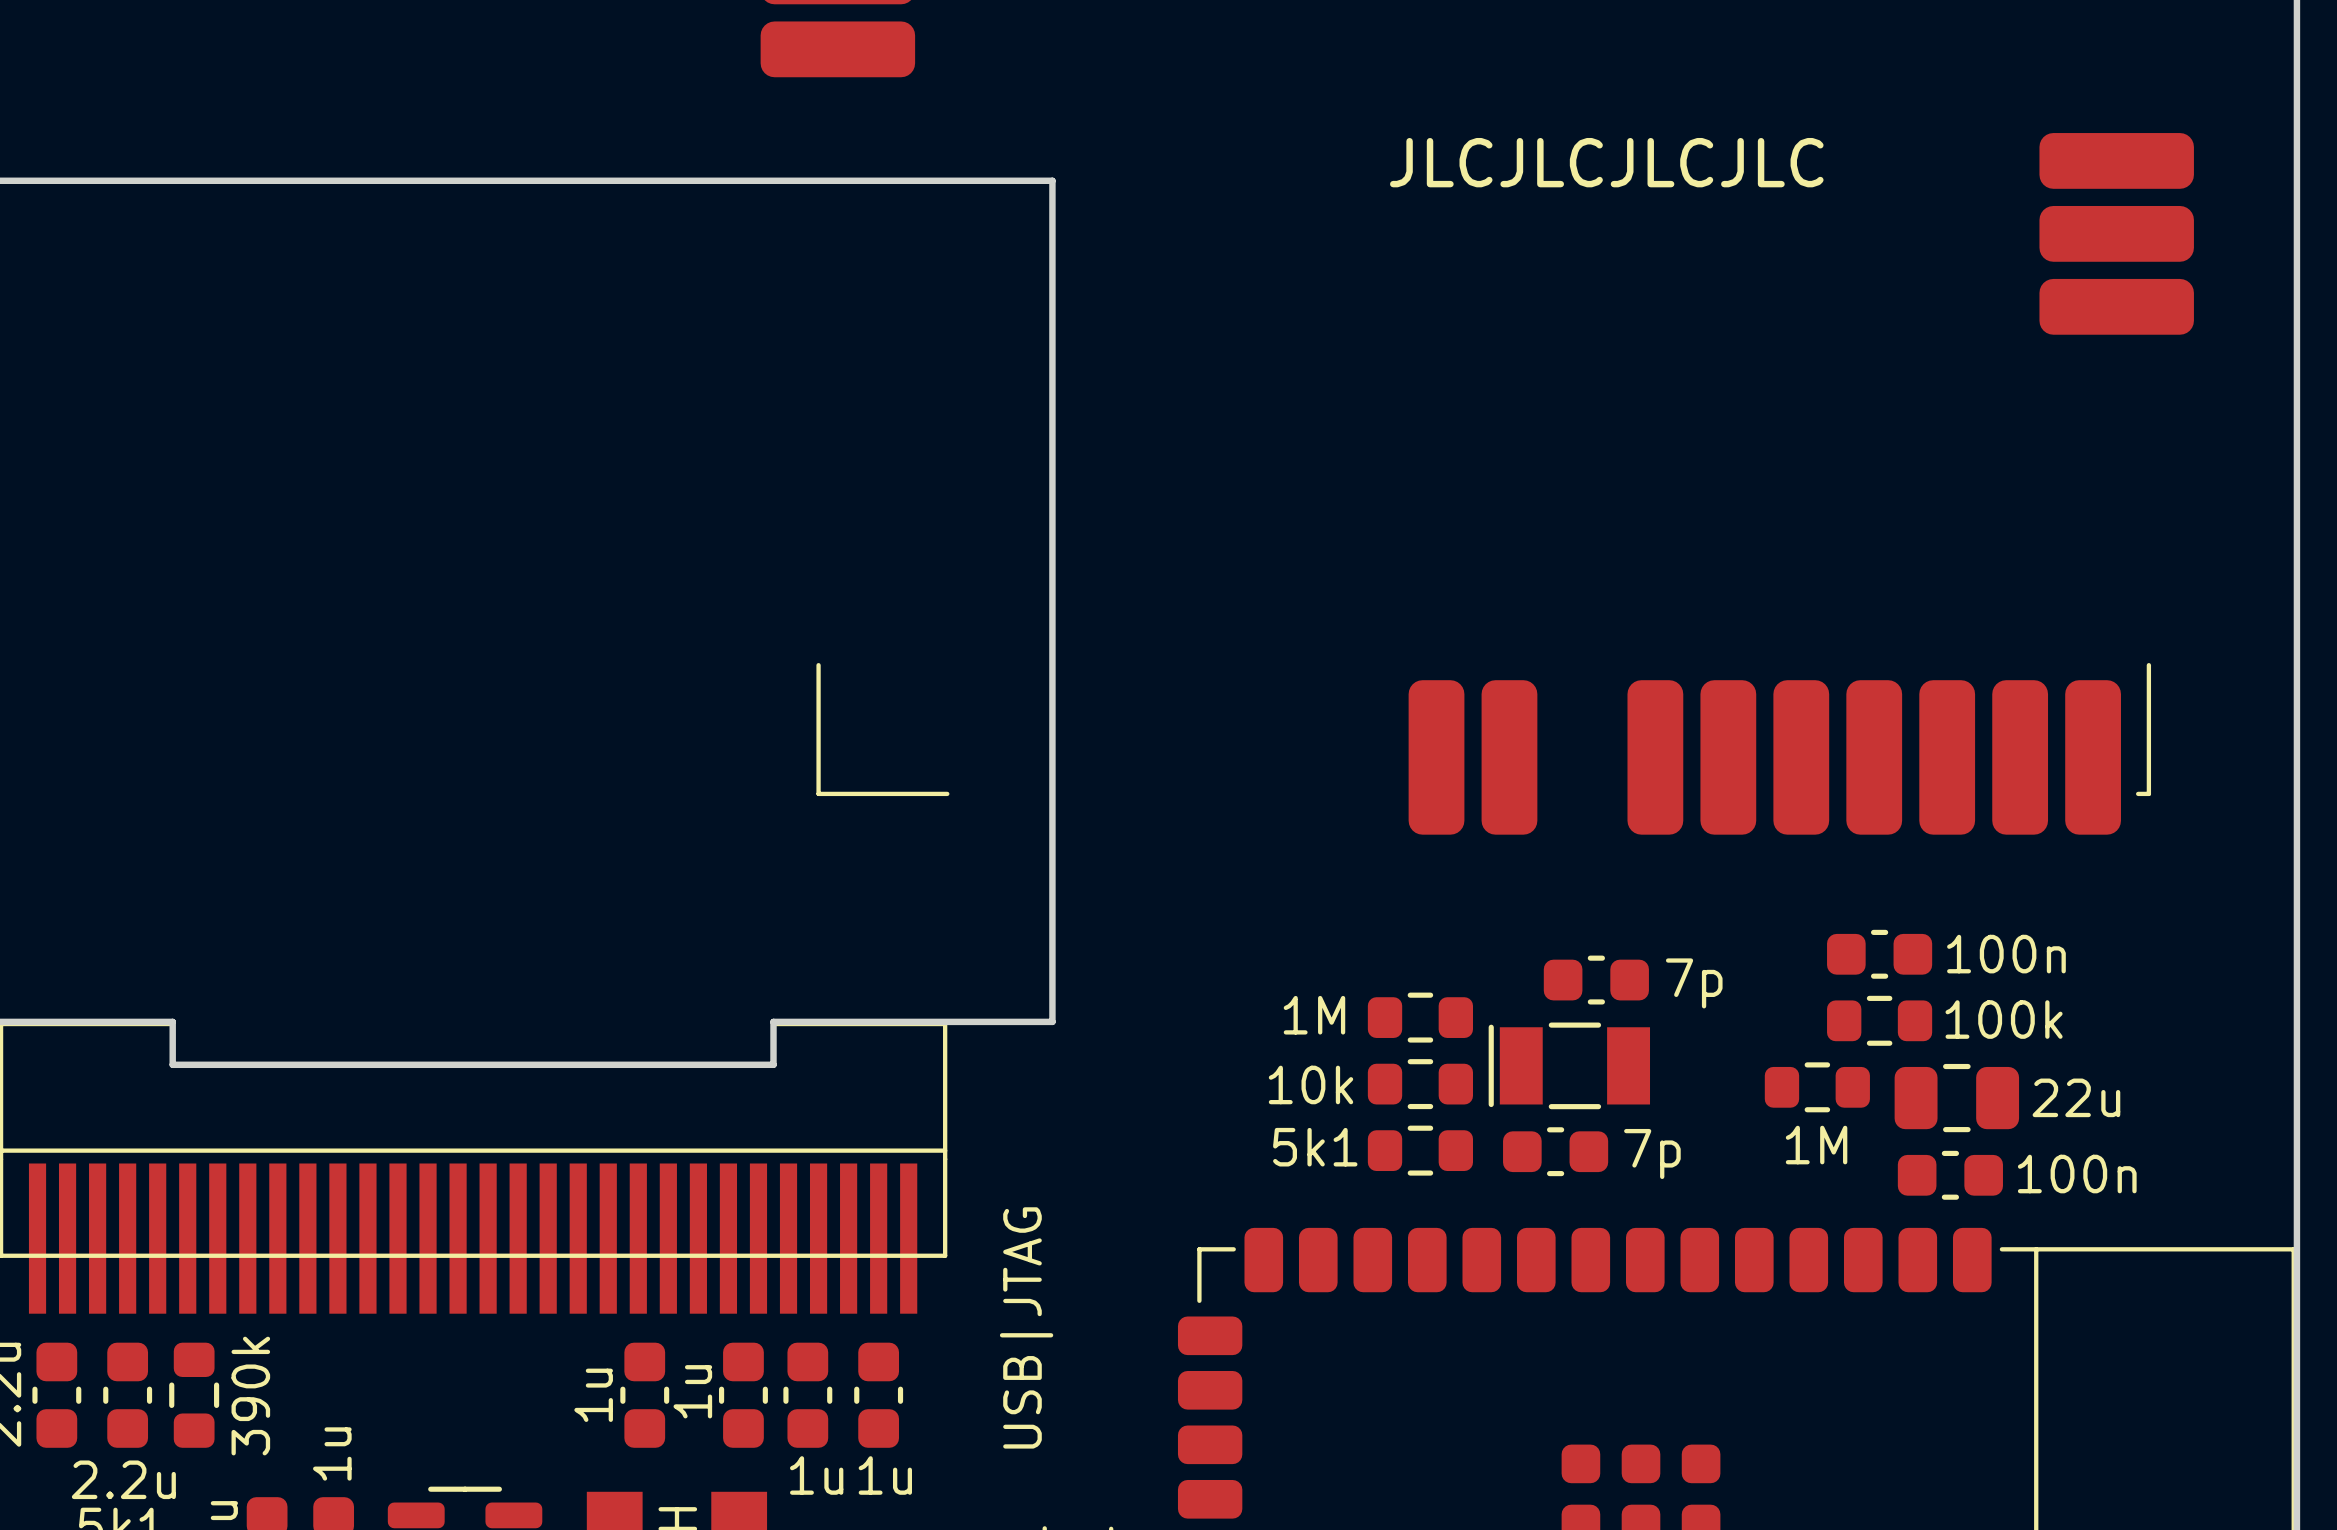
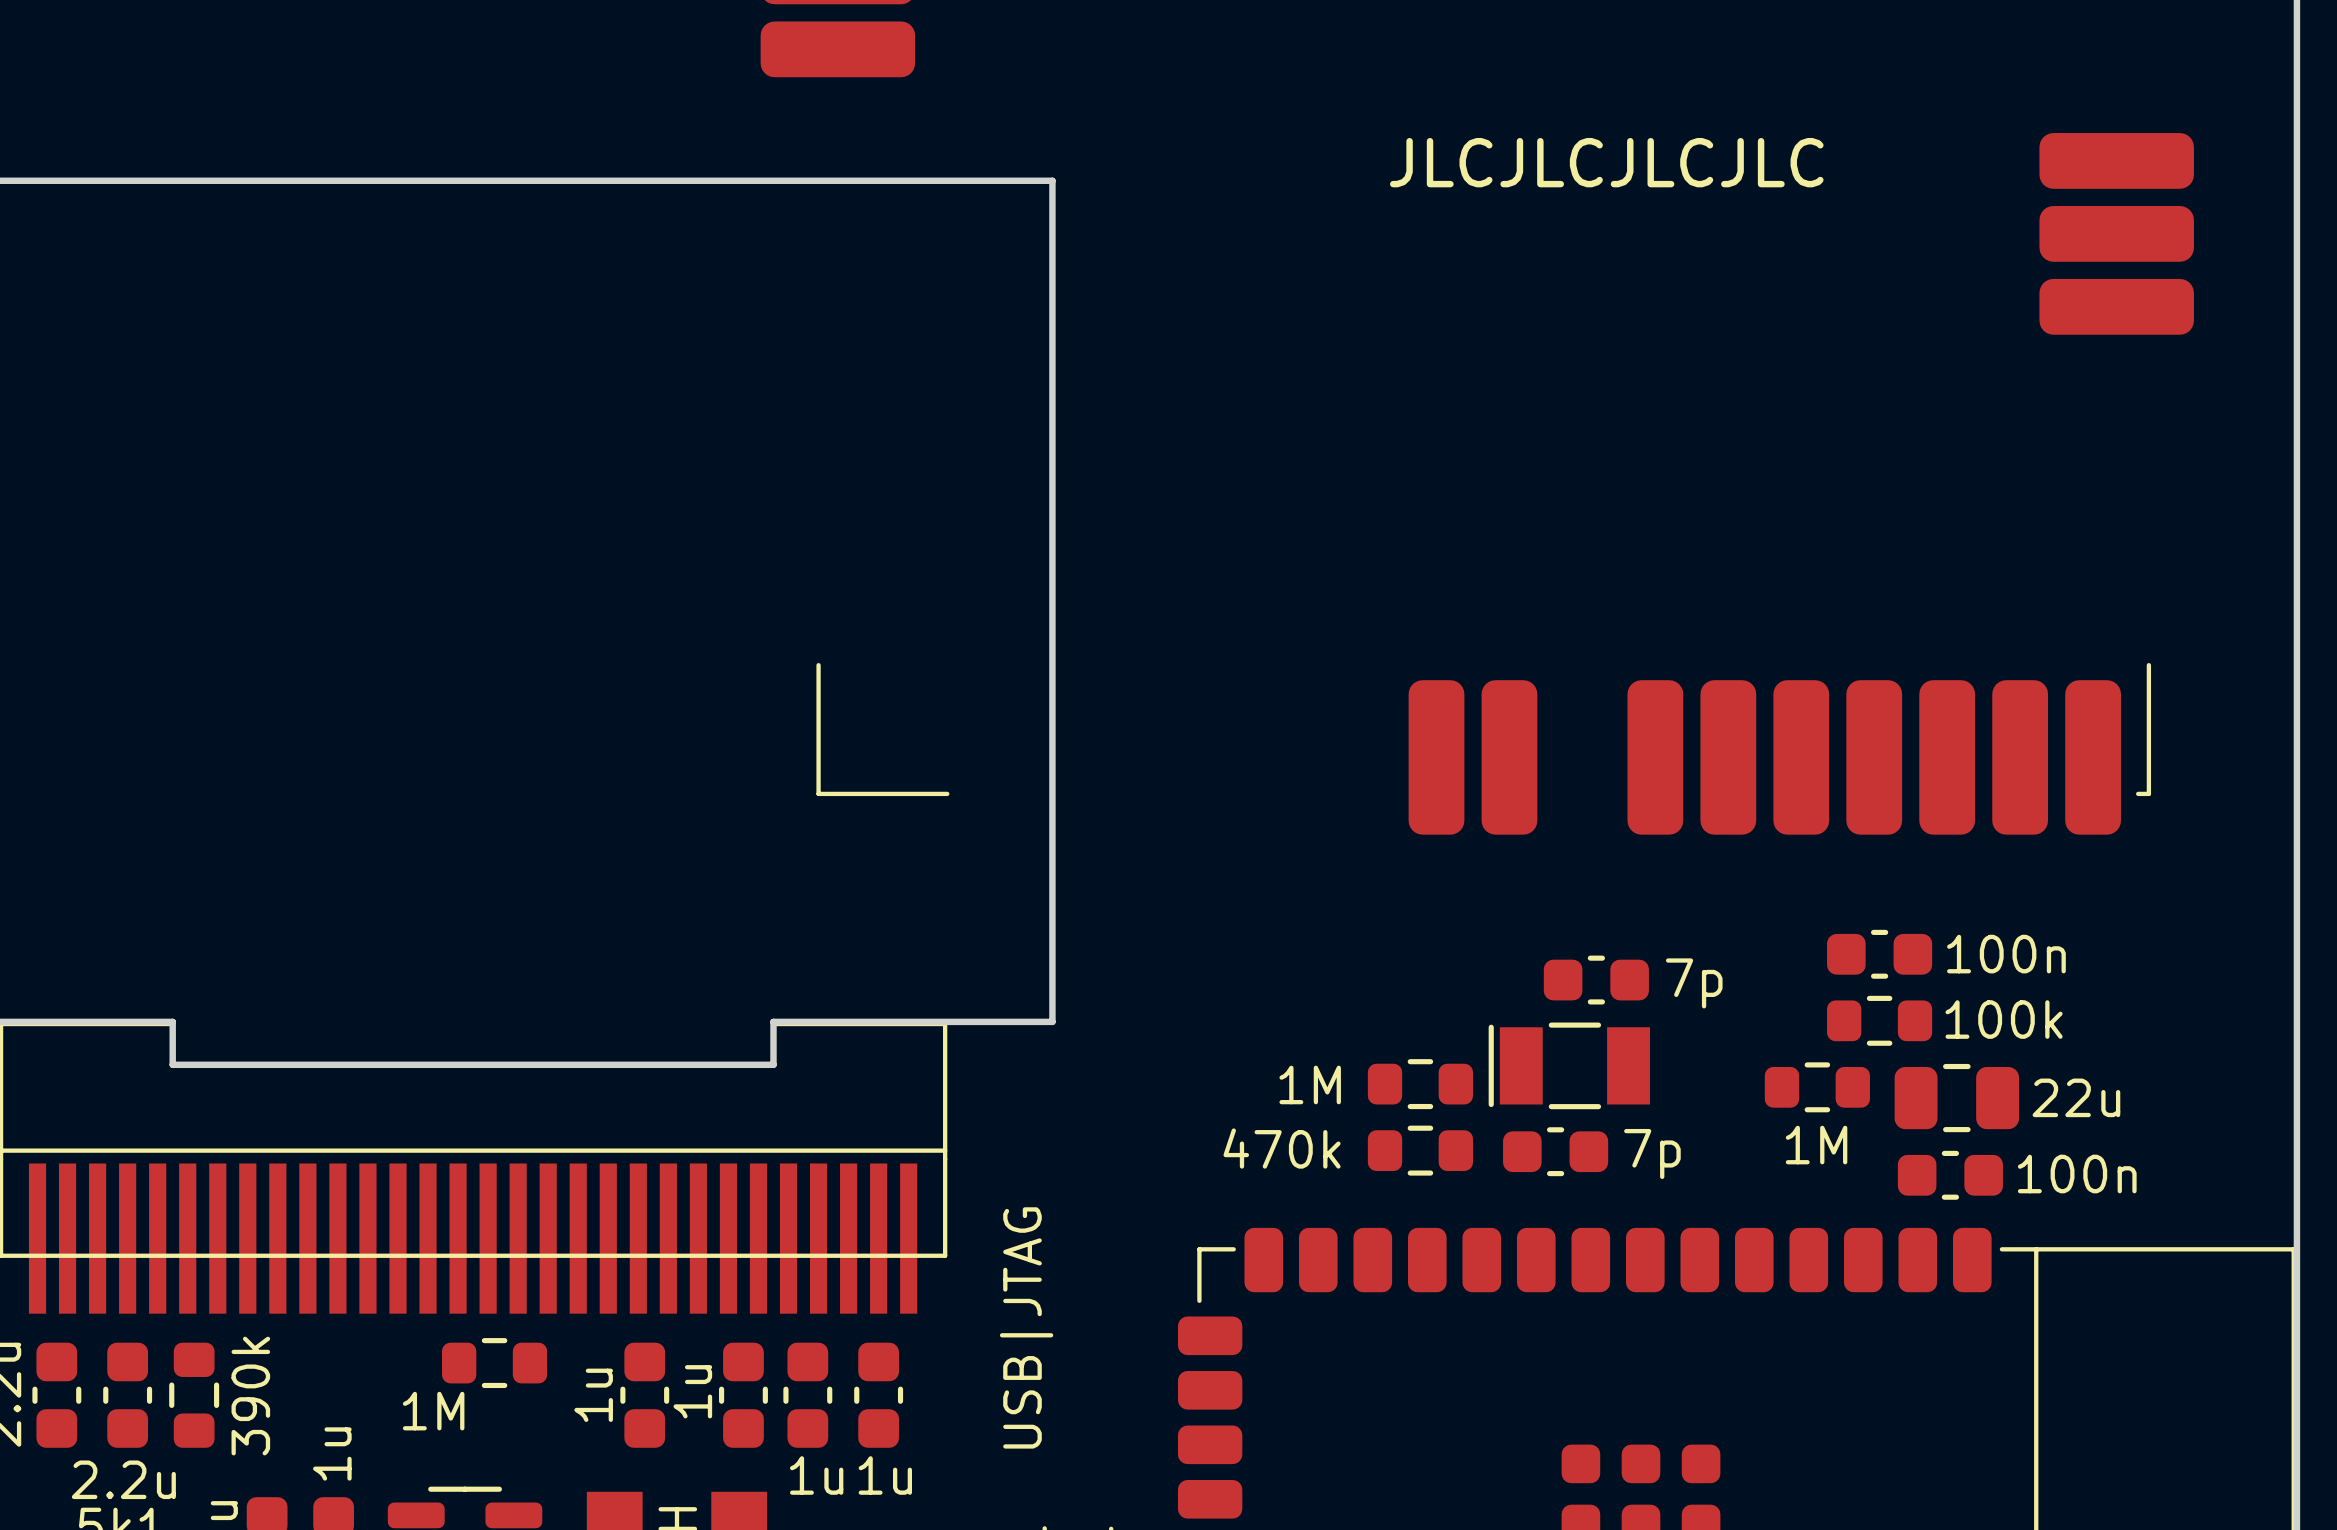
part value position: 1M (1314, 1015) -> 1M (433, 1411)
part position: (1420, 1017) -> (494, 1363)
part value: 10k (1310, 1084) -> 1M (1310, 1084)
part value: 5k1 (1315, 1147) -> 470k (1282, 1148)

